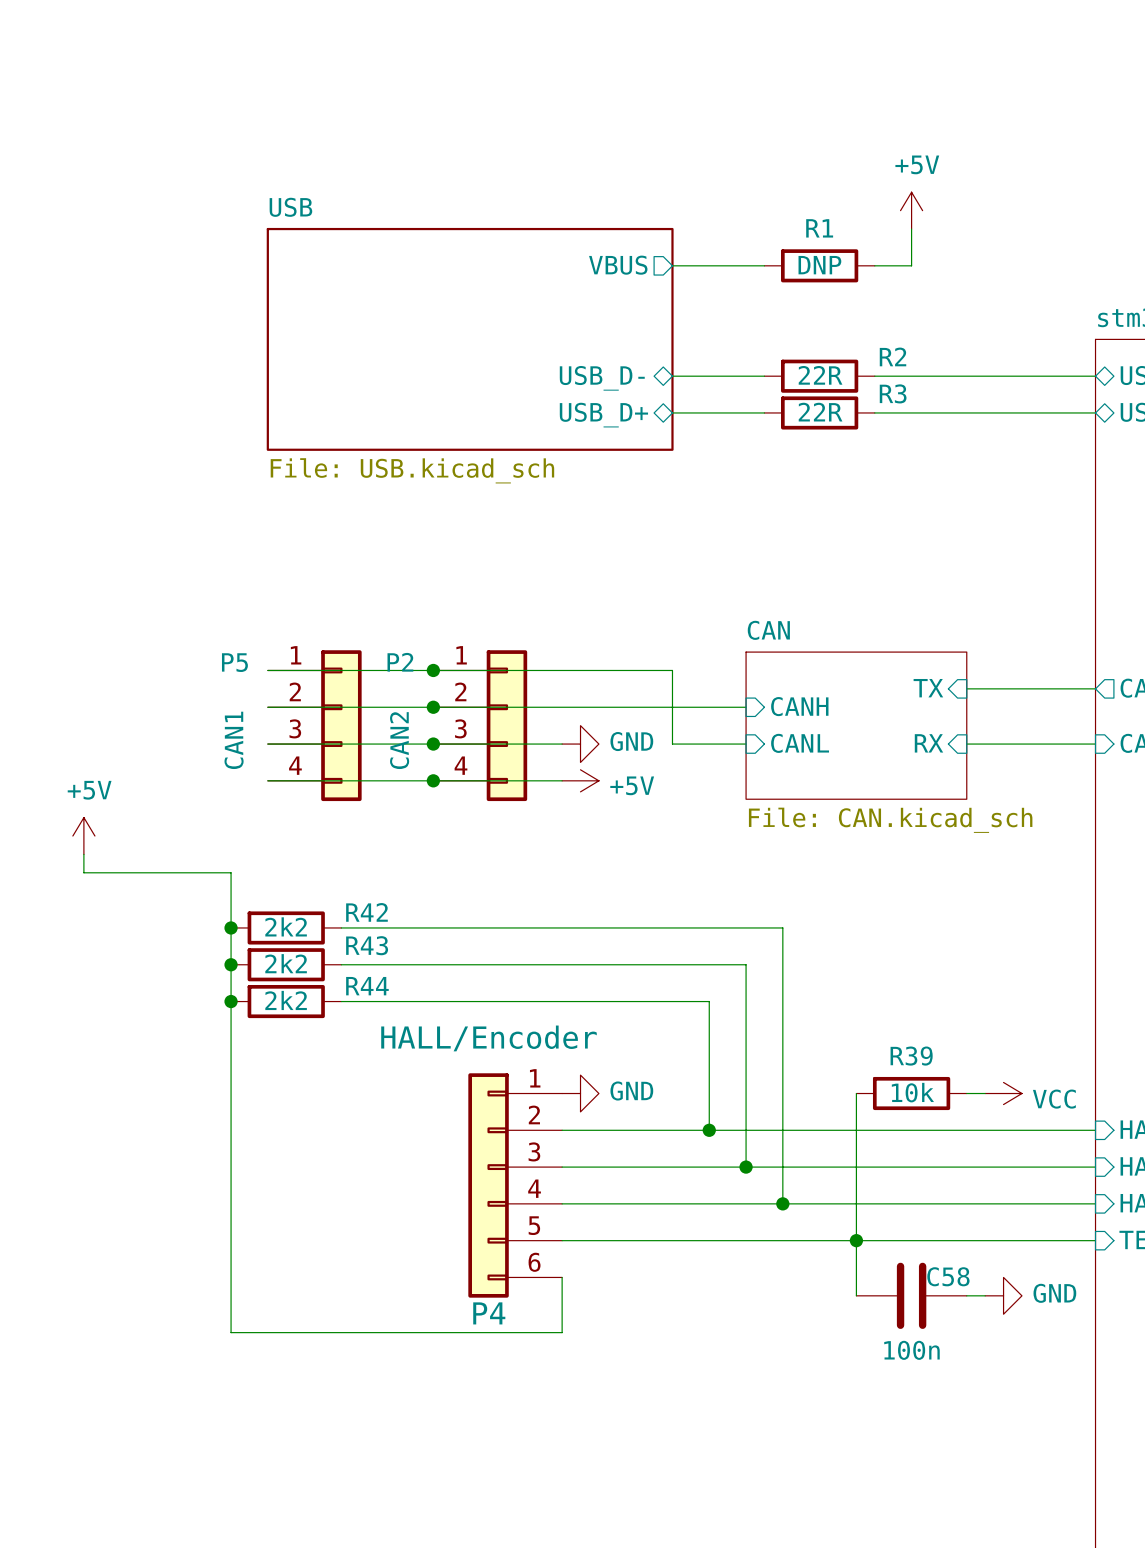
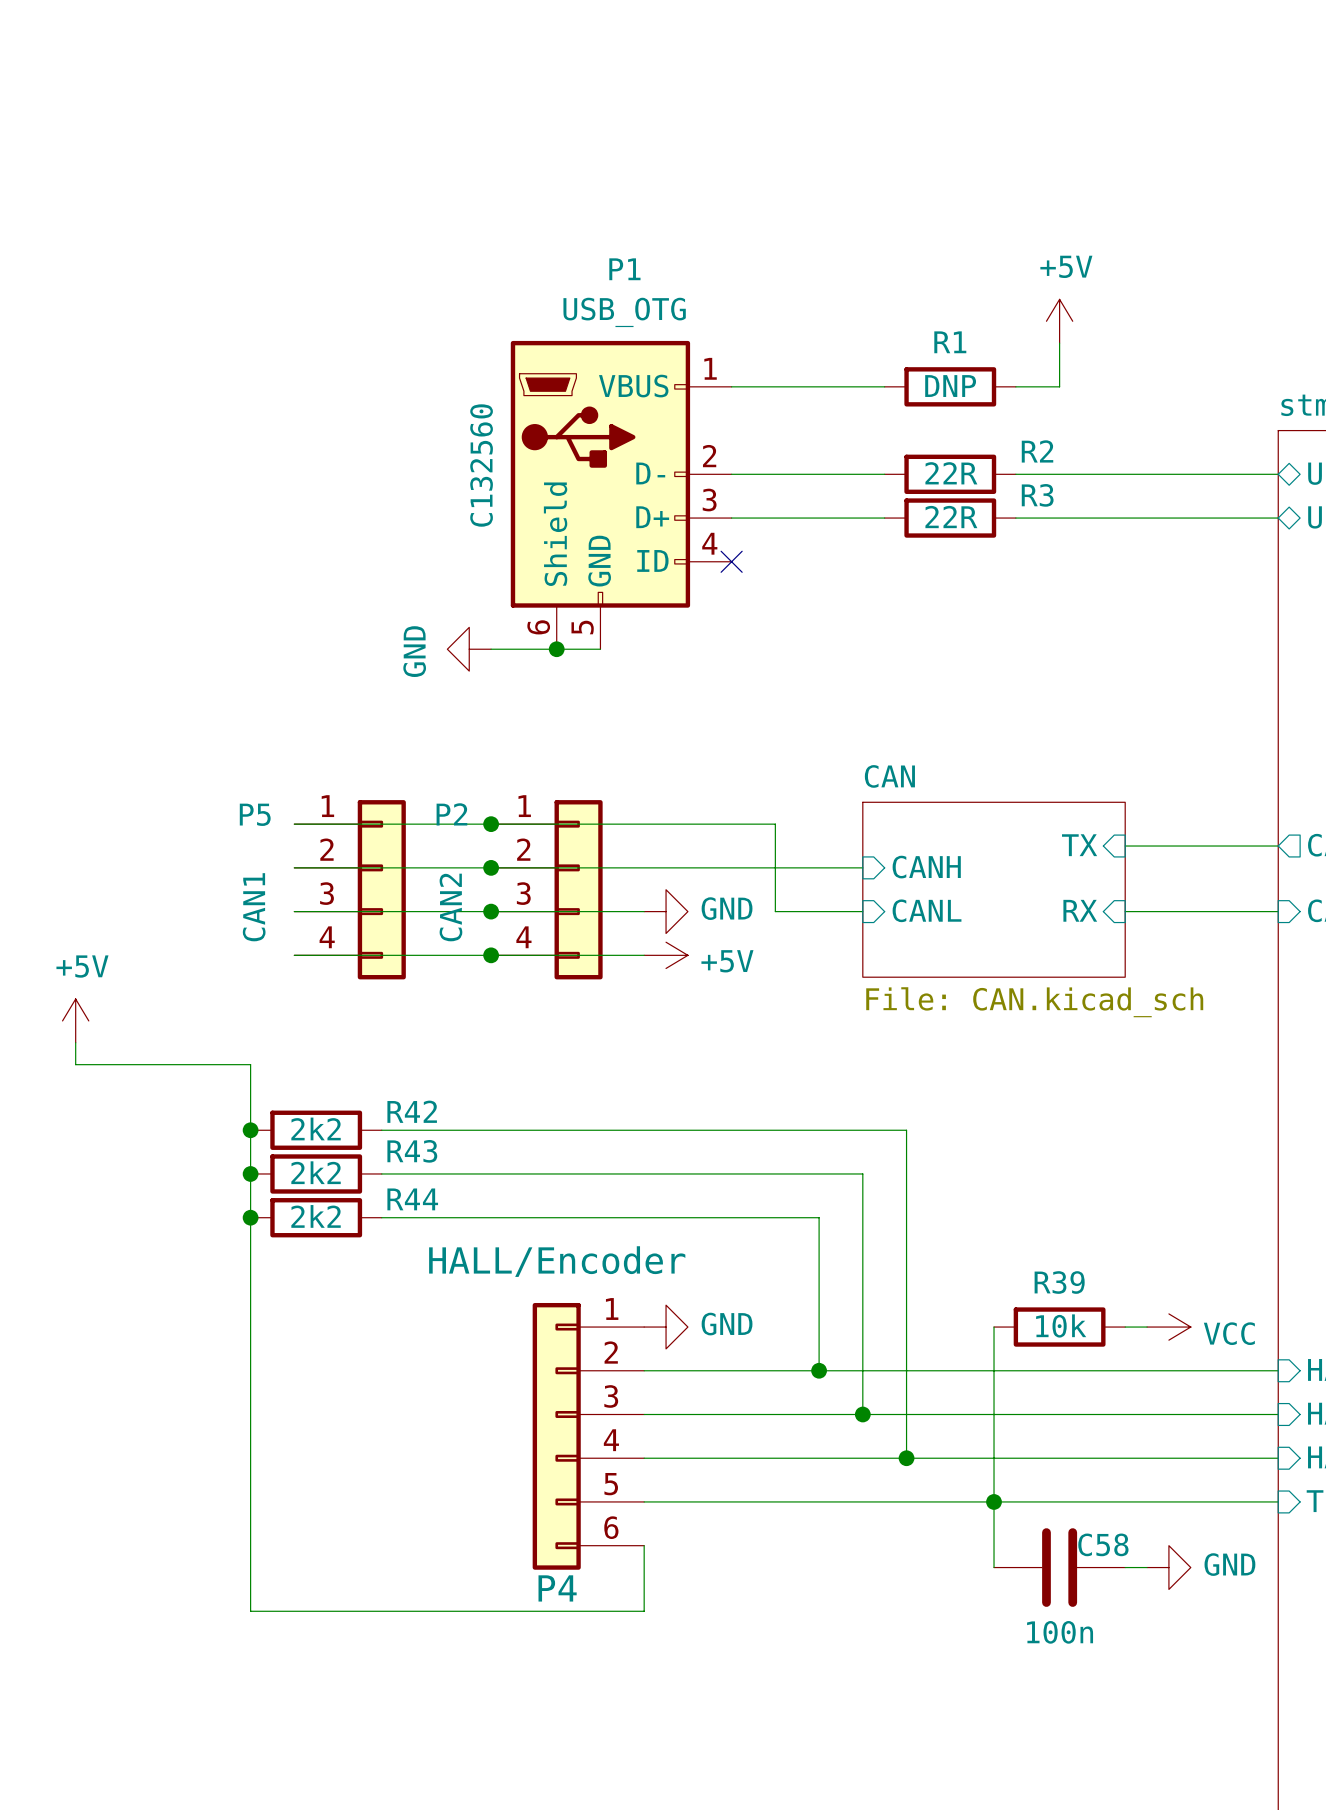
power symbol position: +5V (911, 210) -> +5V (1059, 321)
wire: (911, 229) (911, 265) (874, 265) -> (1059, 343) (1059, 386) (1015, 386)
sheet pin: VBUS (618, 265) -> none
wire: (672, 265) (764, 265) -> (491, 649) (600, 649)
R1 position: (819, 265) -> (950, 386)
wire: none -> (731, 386) (884, 386)
sheet USB: File: USB.kicad_sch (470, 339) -> none
wire: none -> (731, 474) (775, 474)
sheet pin: USB_D- (602, 378) -> none
P1: none -> USB_OTG (621, 495)
wire: none -> (731, 518) (775, 518)
sheet pin: USB_D+ (603, 415) -> none
no-connect mark: none -> (731, 561)
power symbol: none -> GND (469, 649)
junction: none -> (556, 649)

